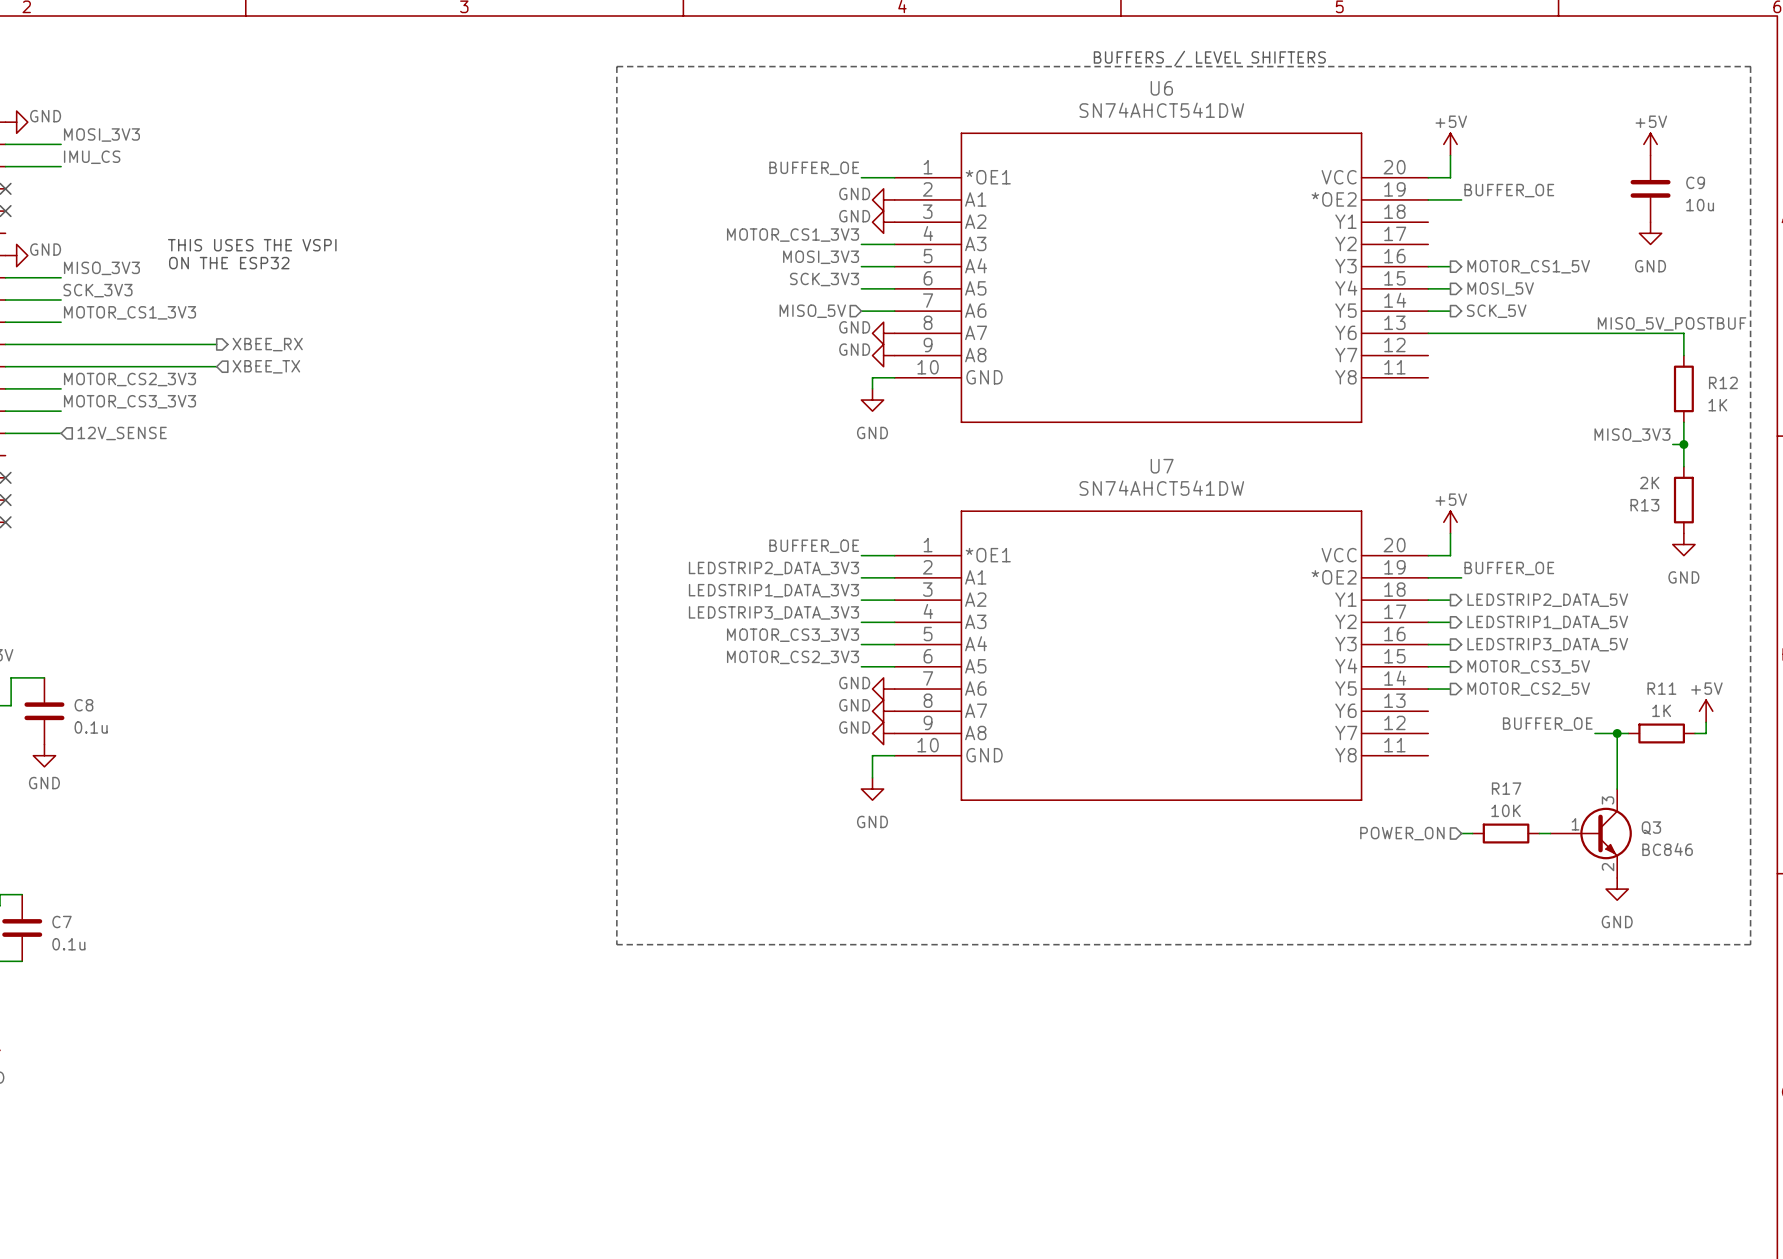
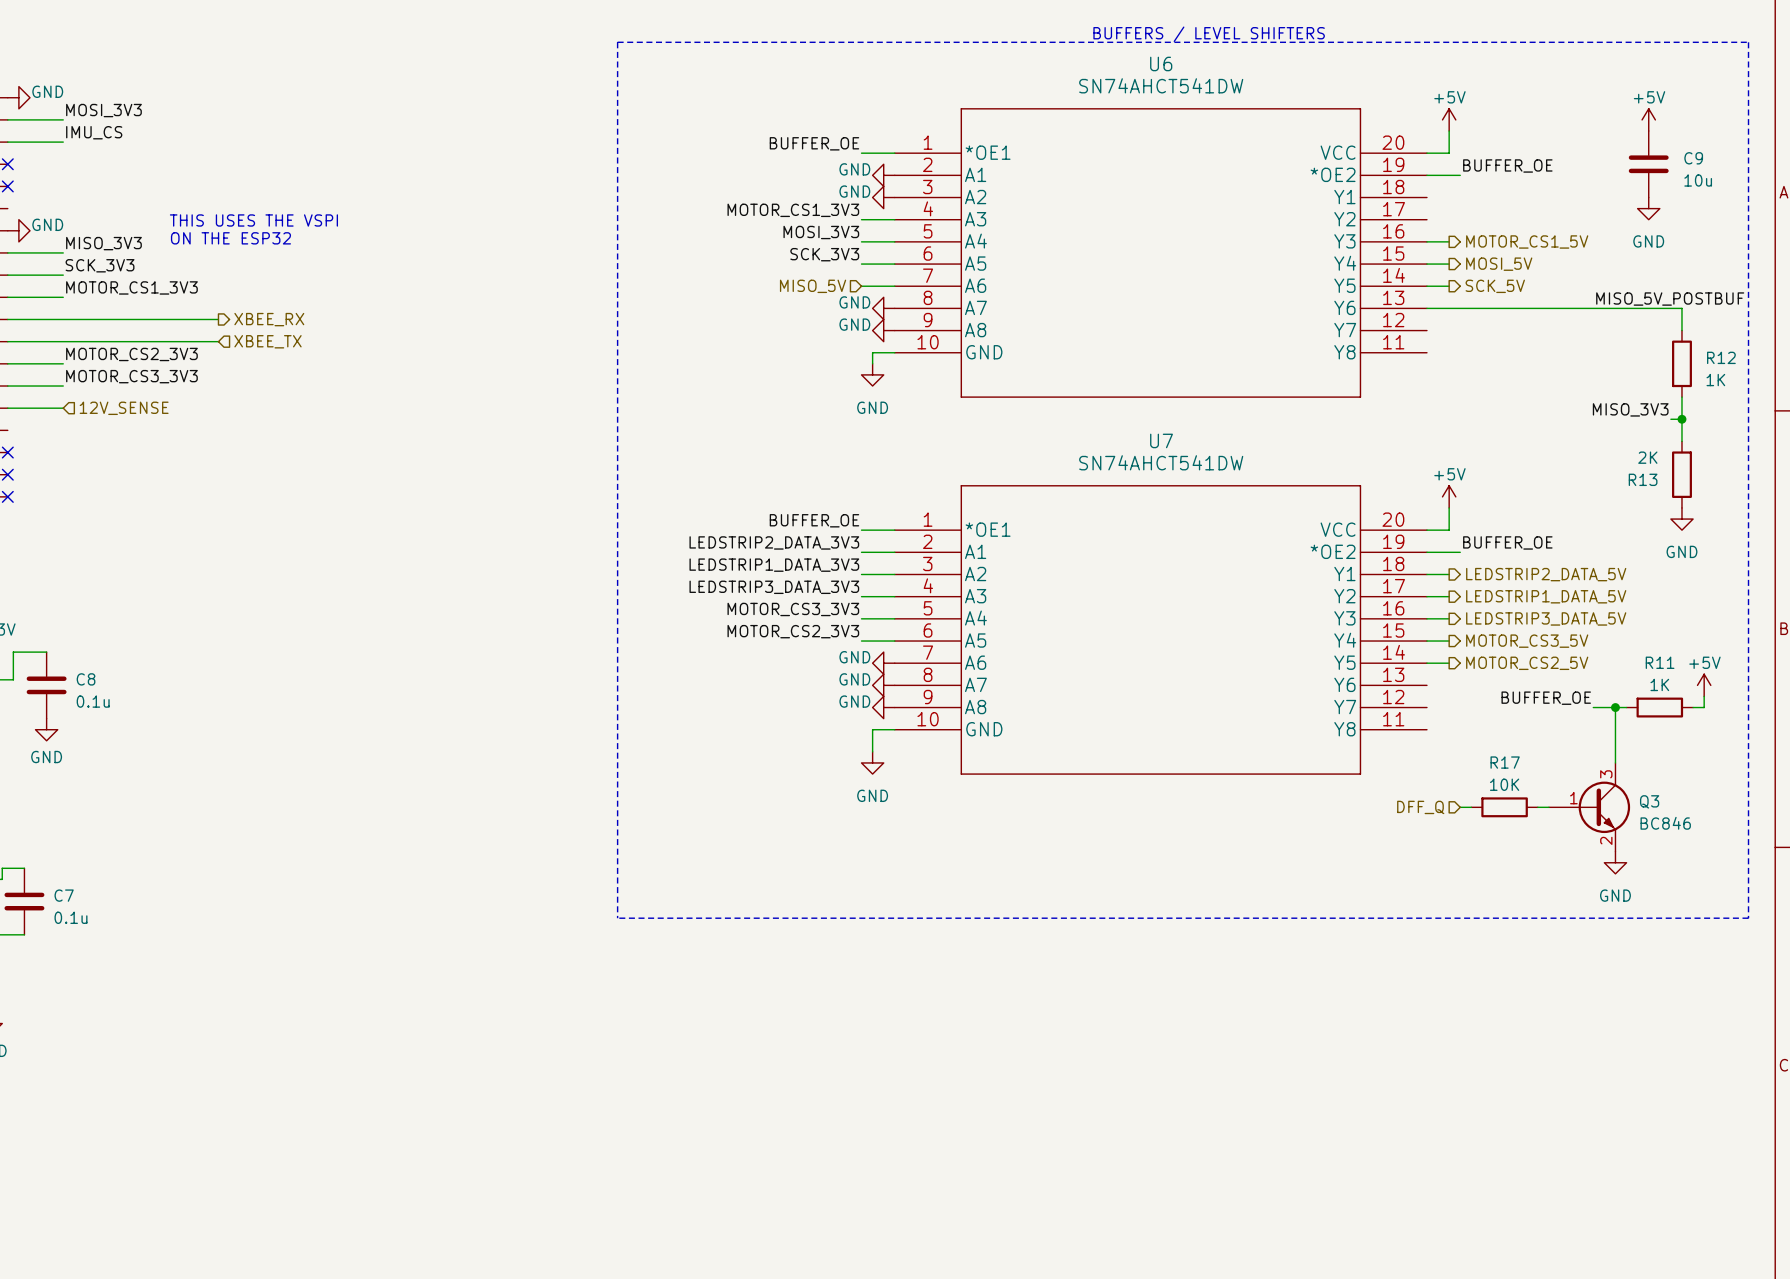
hierarchical label: POWER_ON (1402, 833) -> DFF_Q (1420, 807)

